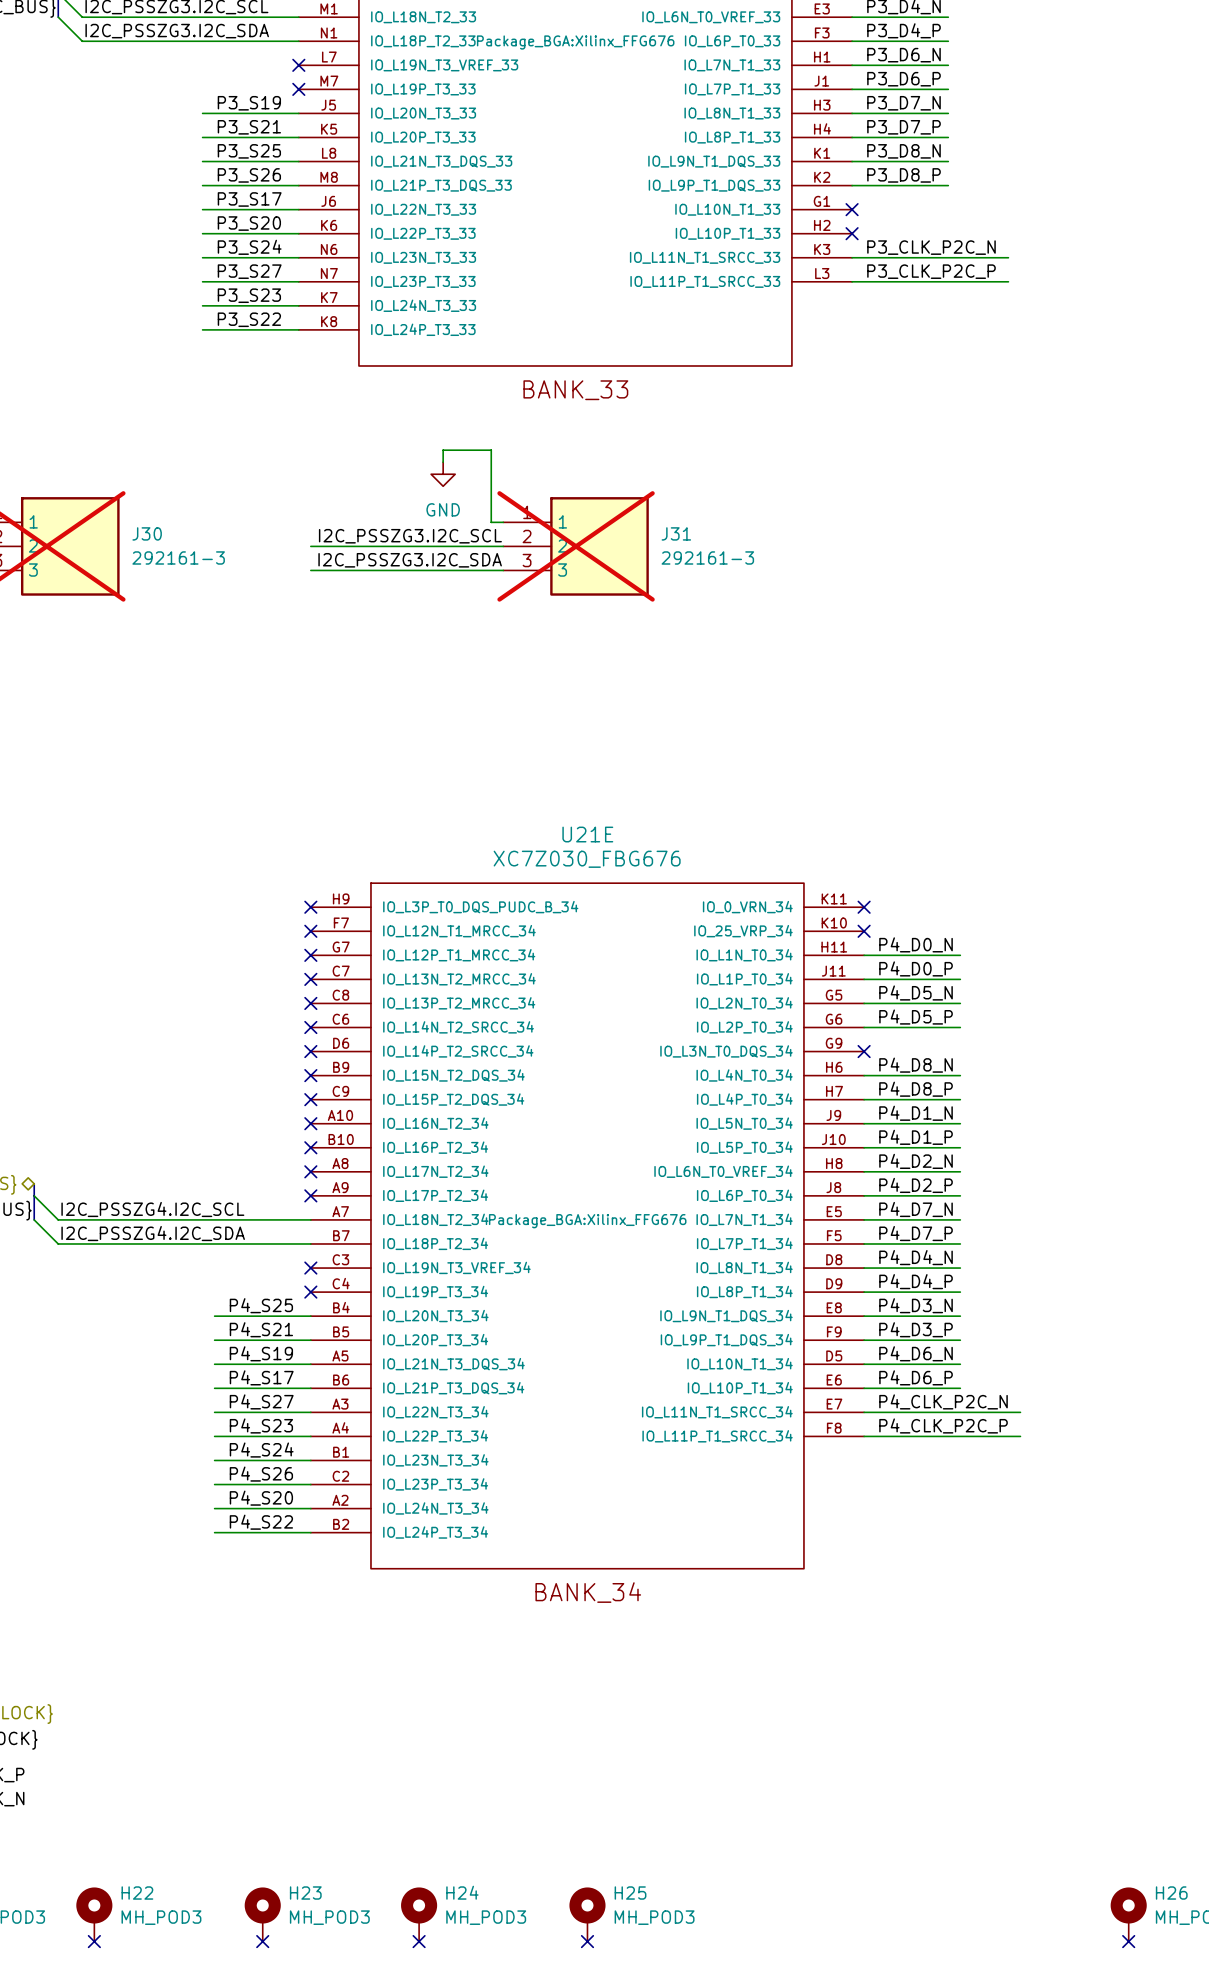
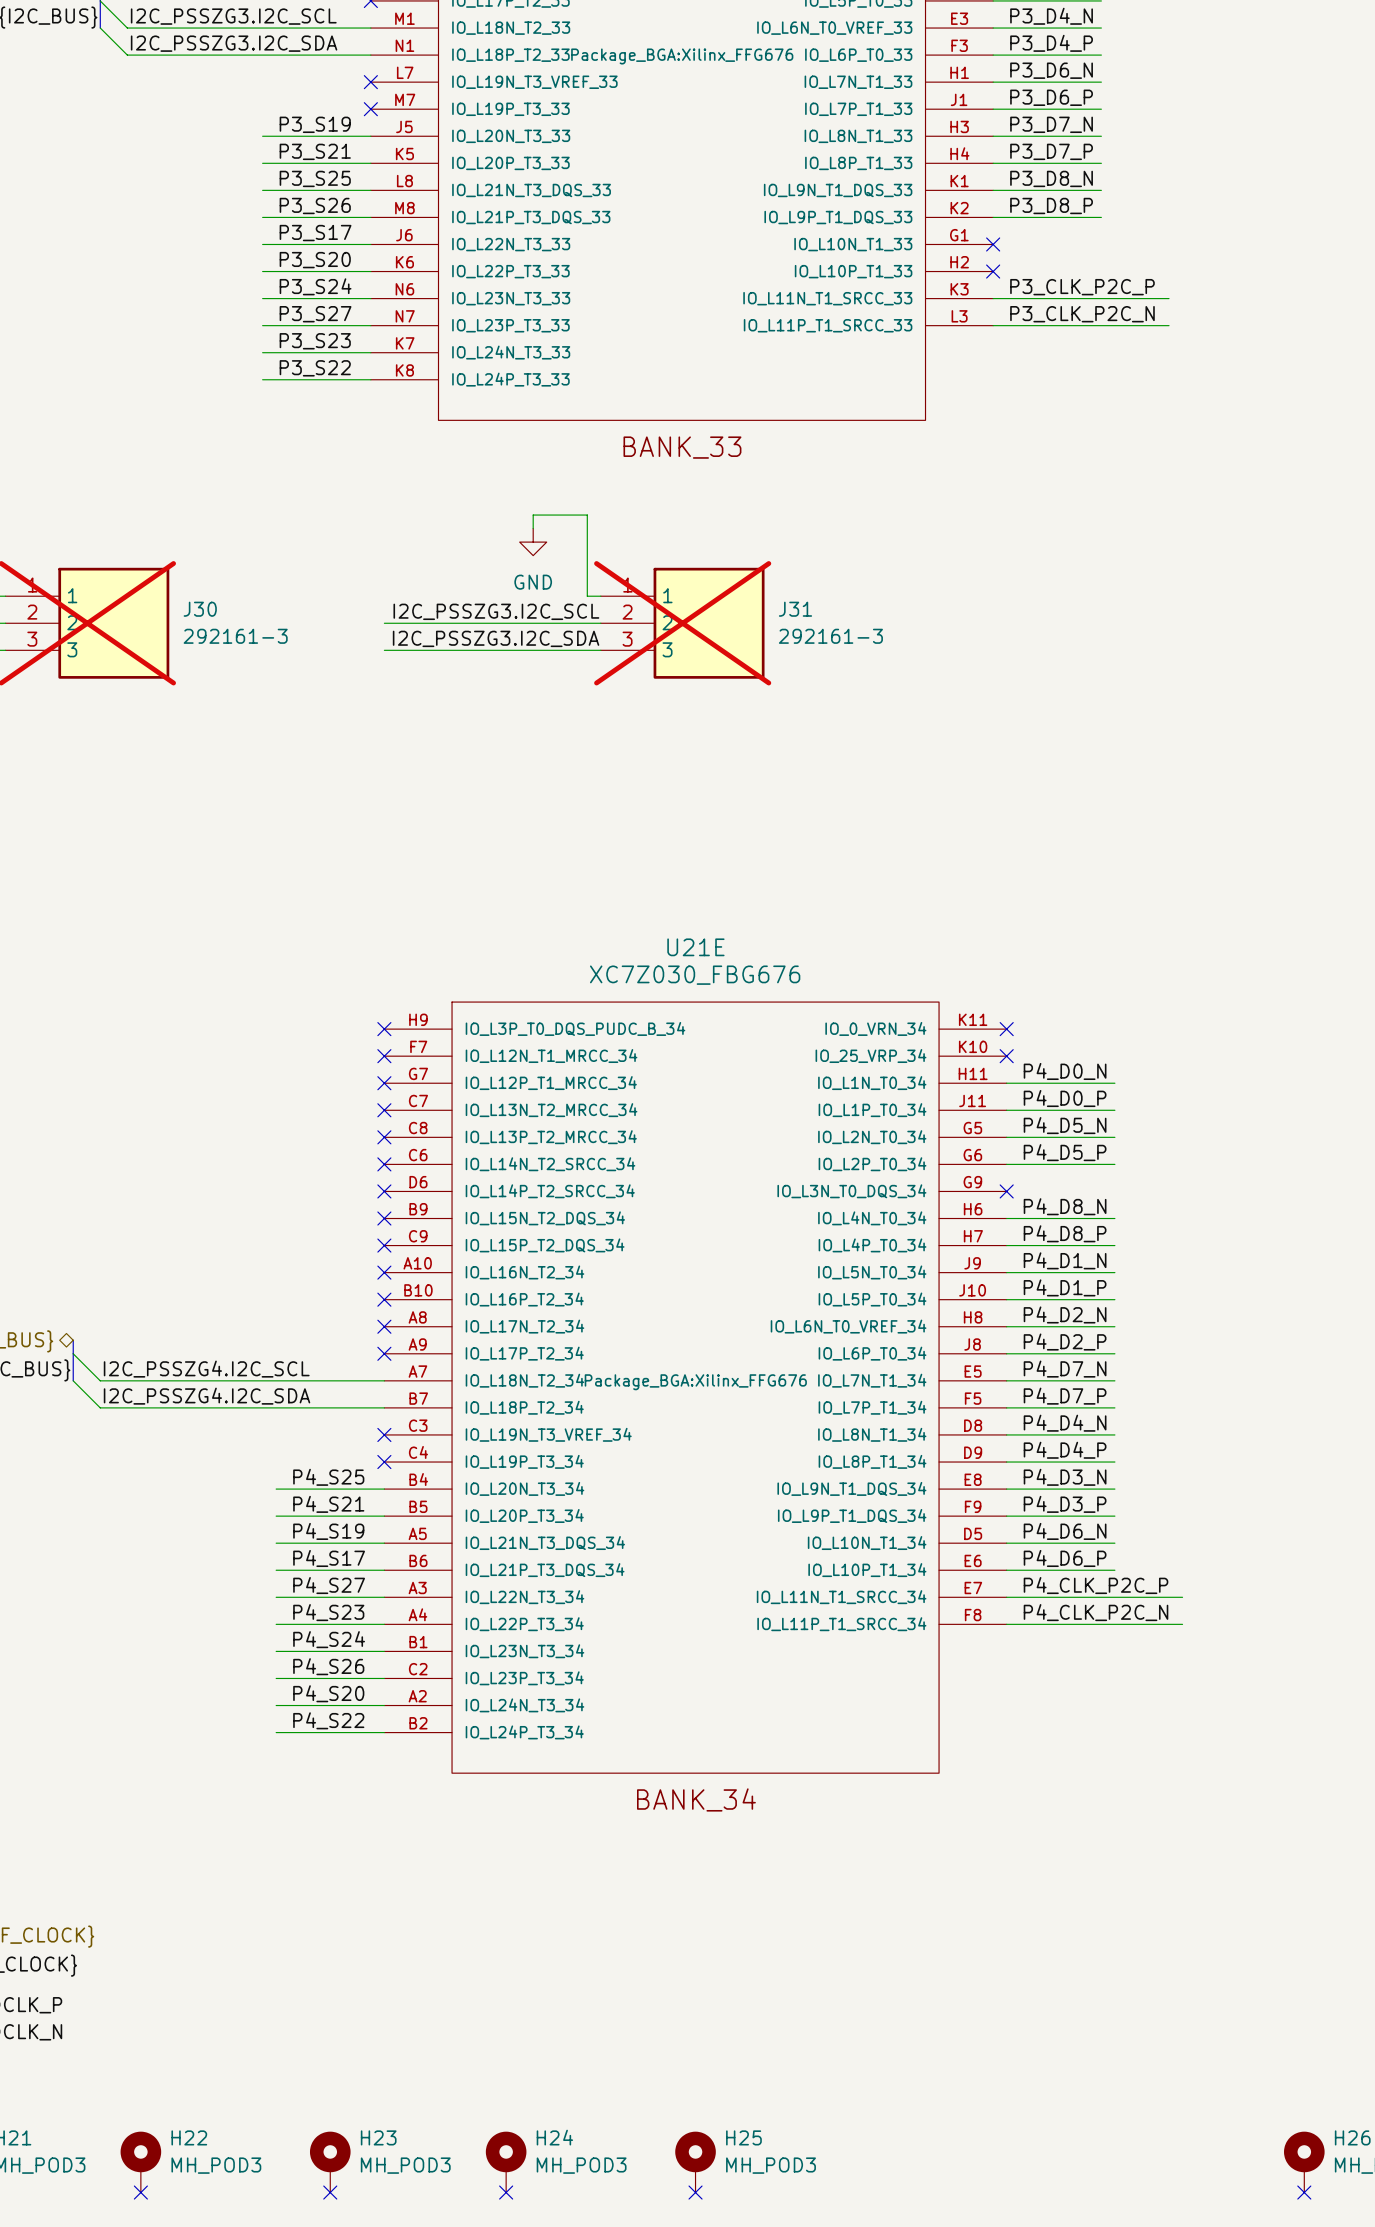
label: P3_CLK_P2C_N (931, 247) -> P3_CLK_P2C_P (1082, 287)
label: P3_CLK_P2C_P (931, 271) -> P3_CLK_P2C_N (1082, 314)
label: P4_CLK_P2C_N (943, 1401) -> P4_CLK_P2C_P (1096, 1585)
label: P4_CLK_P2C_P (943, 1425) -> P4_CLK_P2C_N (1096, 1612)

